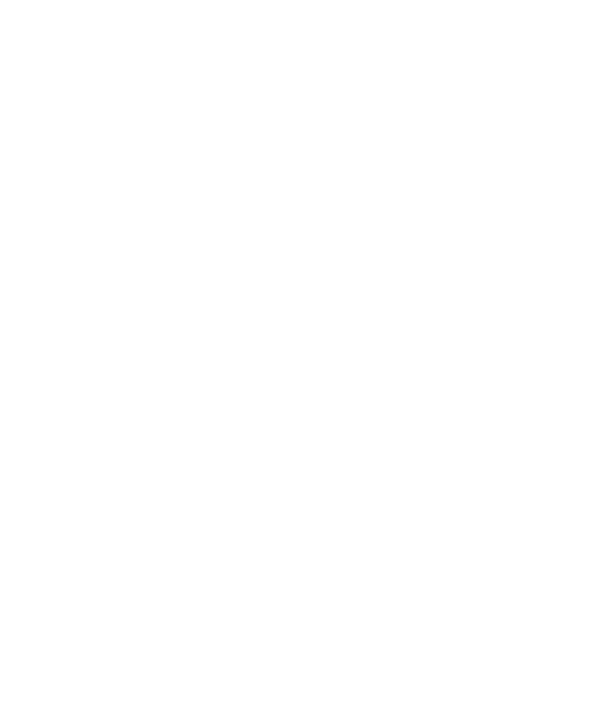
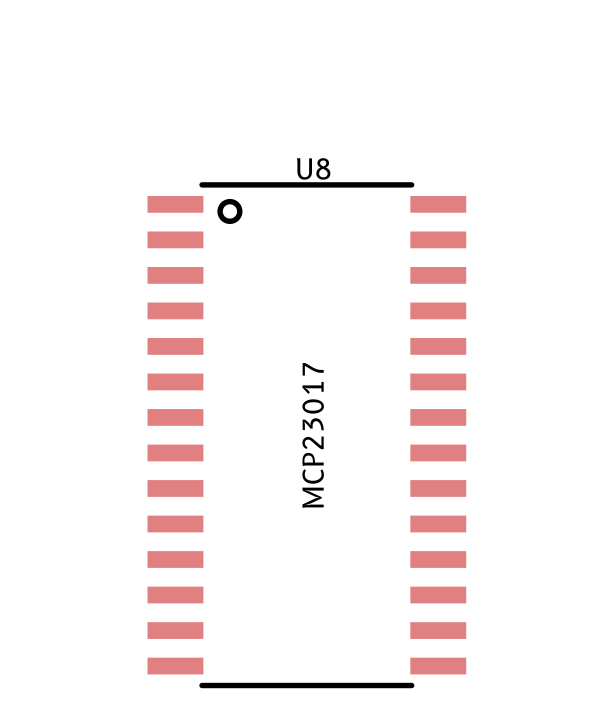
U8: none -> MCP23017 (306, 435)

